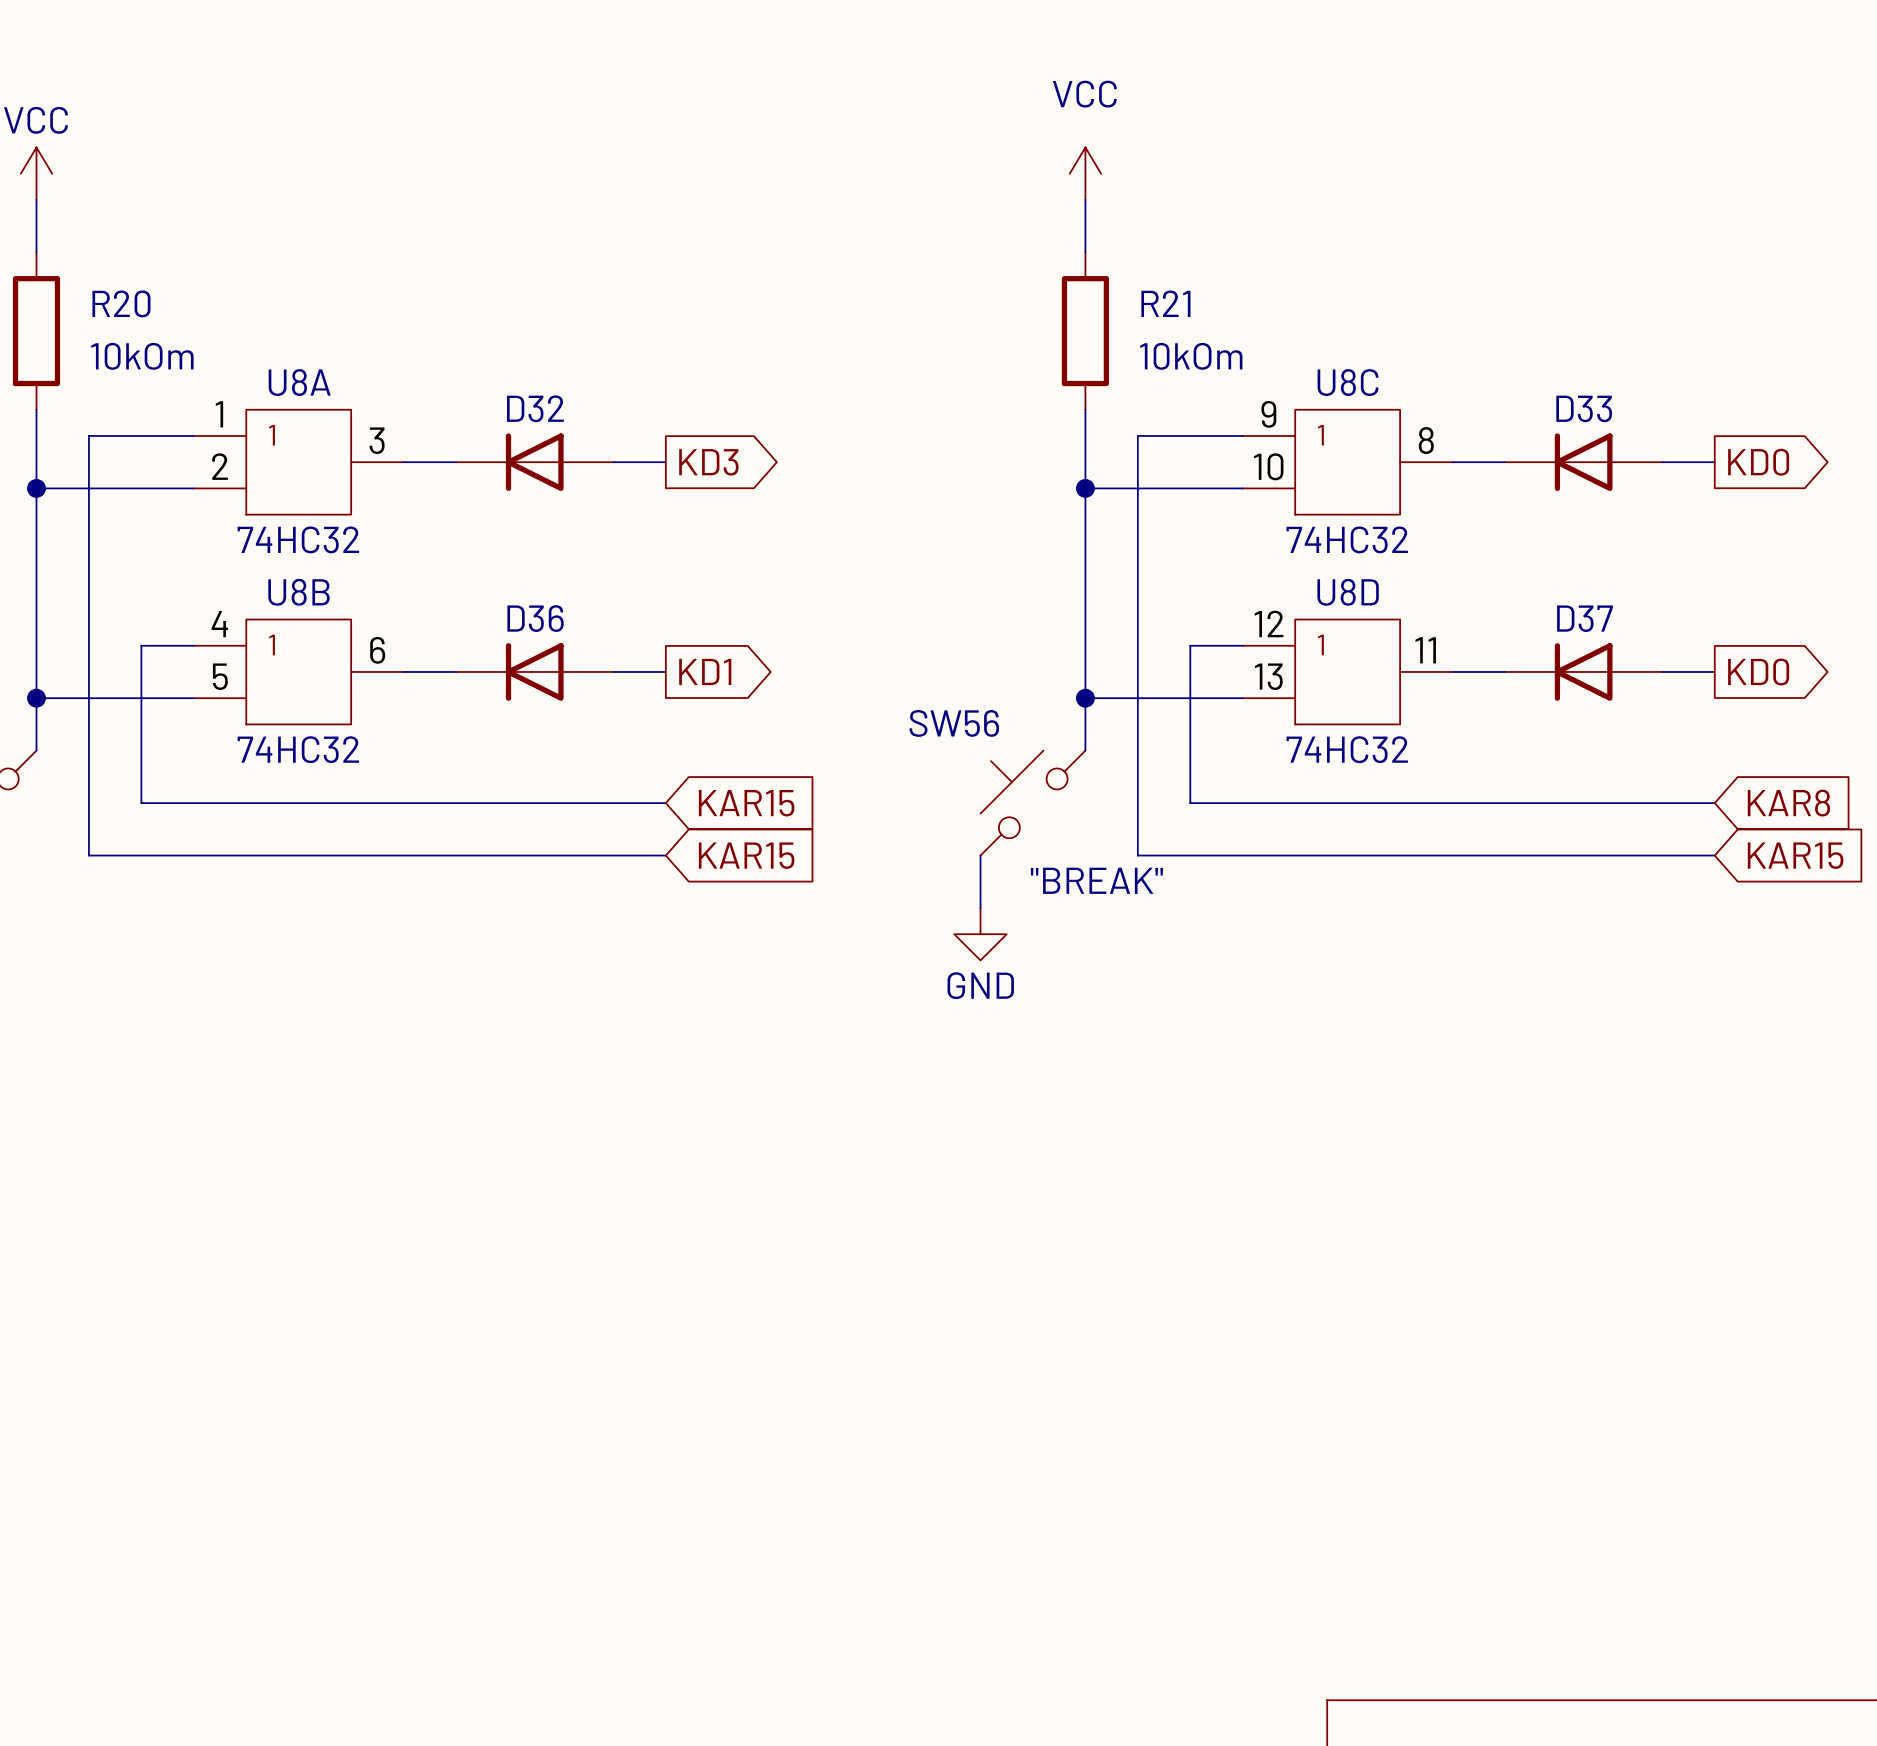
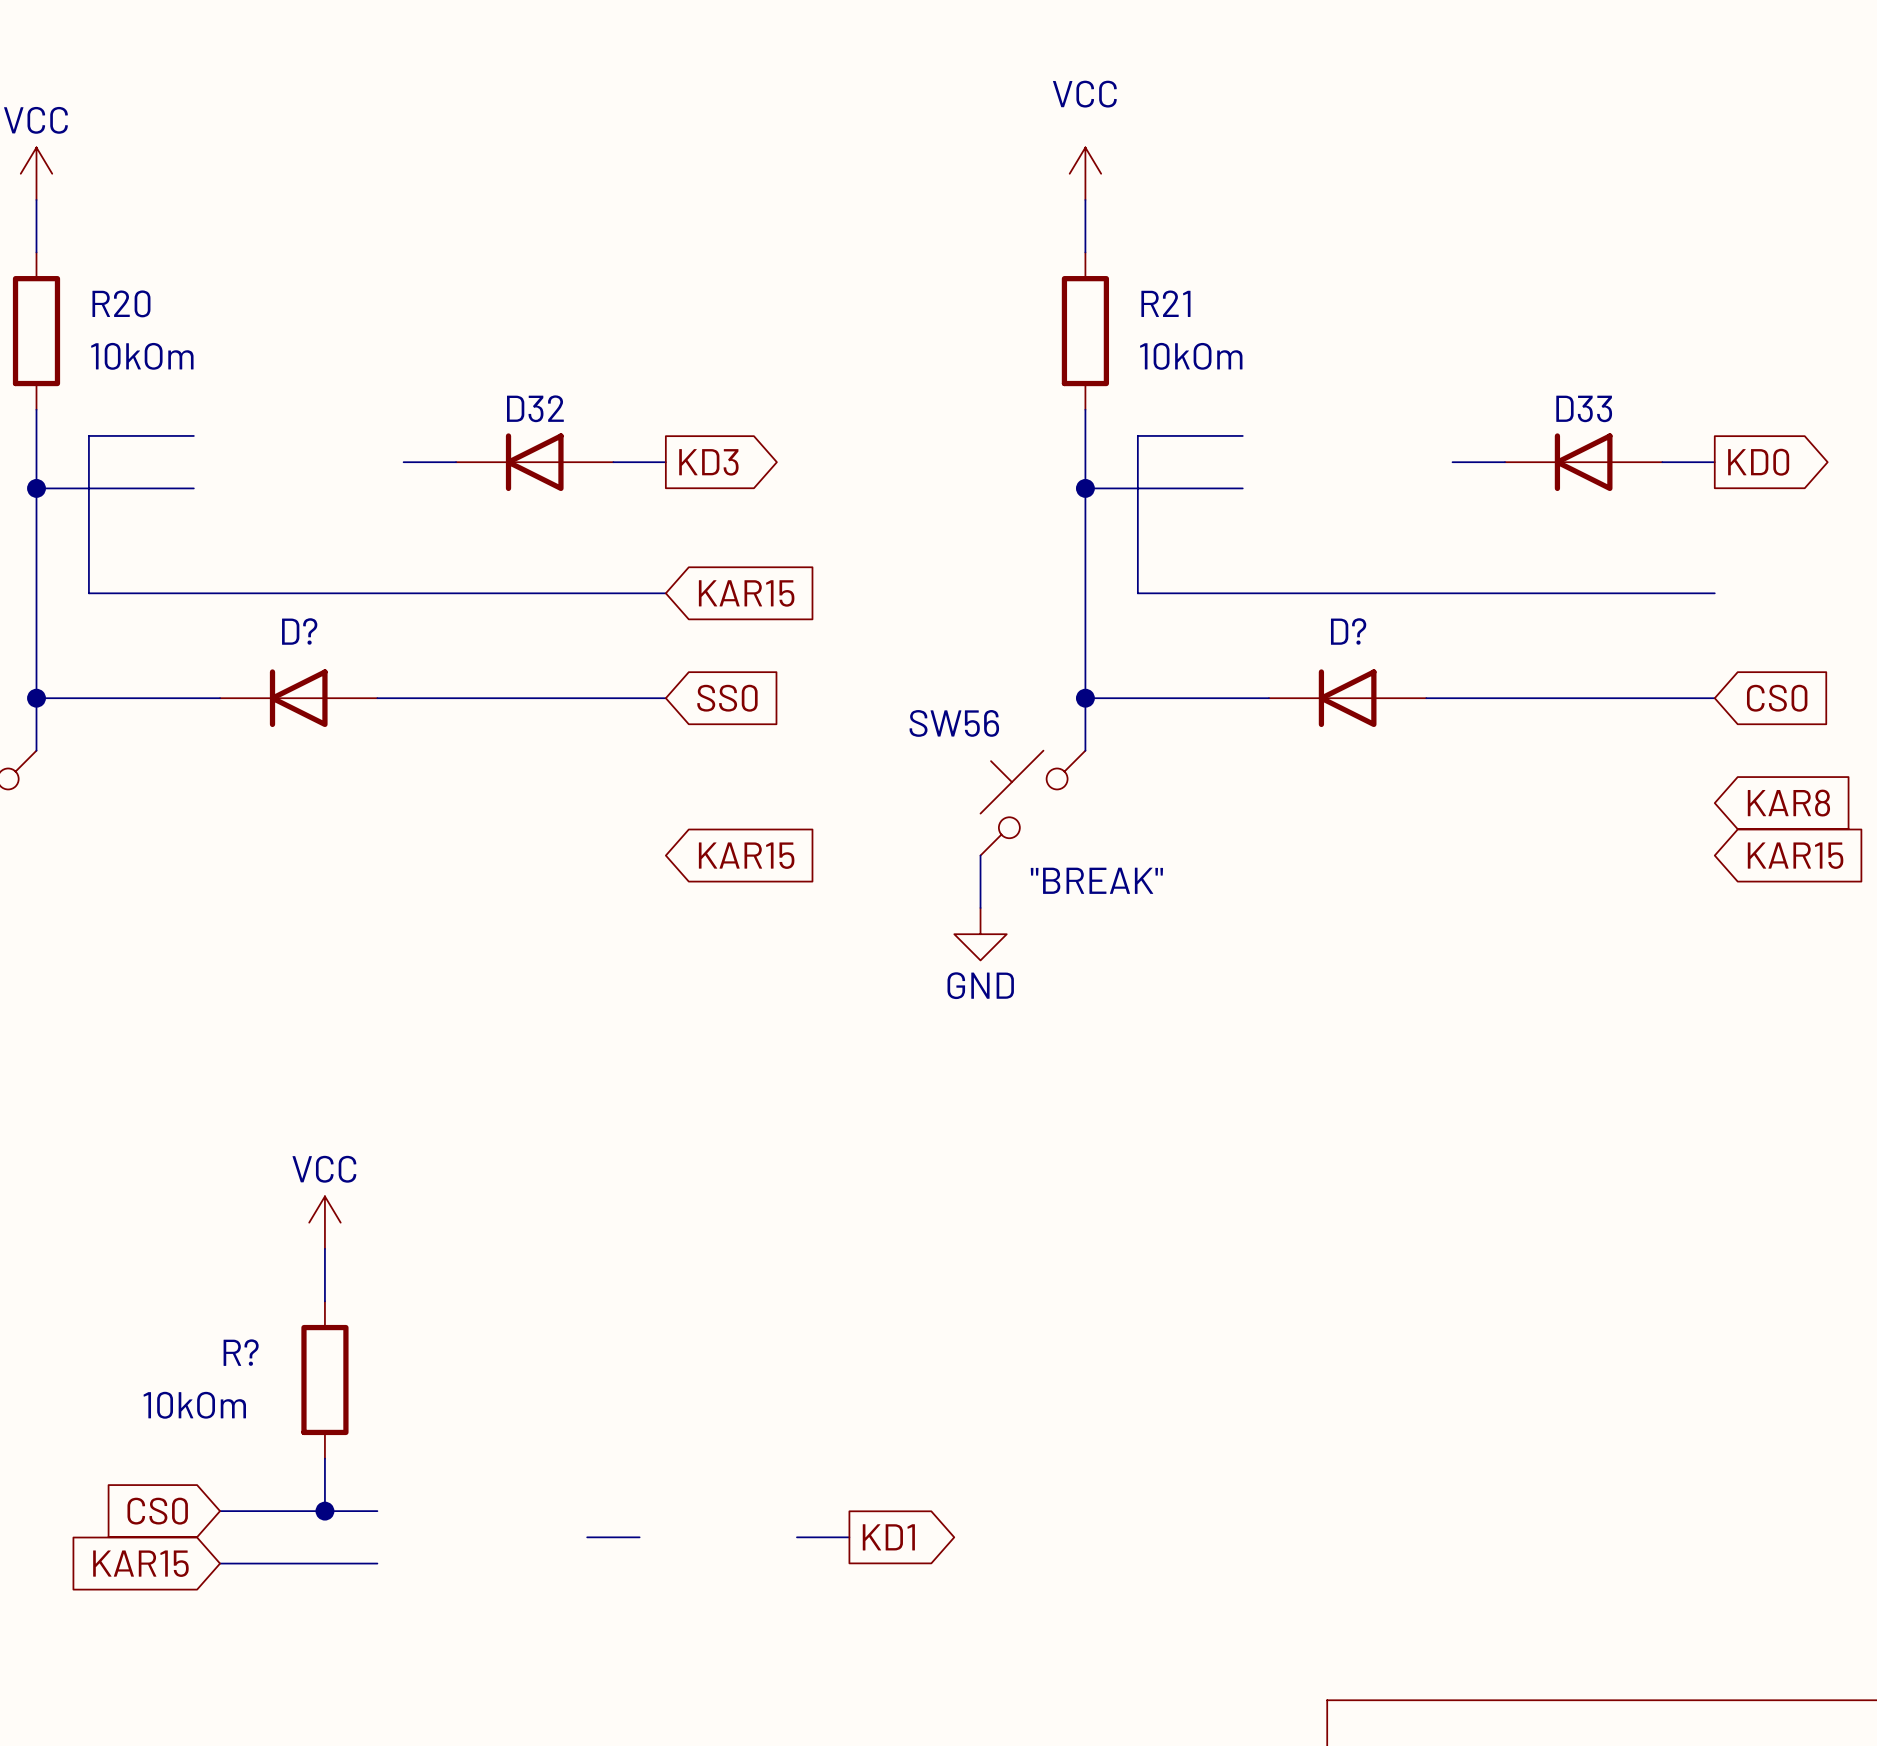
U8A: 74HC32 (298, 462) -> none
U8C: 74HC32 (1347, 462) -> none
wire: (88, 593) (88, 855) (665, 855) -> (88, 593) (665, 593)
wire: (1137, 593) (1137, 855) (1714, 855) -> (1137, 593) (1714, 593)
wire: (193, 645) (141, 645) (141, 803) (665, 803) -> none
wire: (1242, 645) (1190, 645) (1190, 803) (1714, 803) -> none
U8B: 74HC32 (298, 671) -> none
wire: (403, 671) (456, 671) -> none
D36: (534, 671) -> none
wire: (613, 671) (665, 671) -> none
global label: KD1 (705, 671) -> none
U8D: 74HC32 (1347, 671) -> none
wire: (1452, 671) (1504, 671) -> none
D37: (1583, 671) -> none
wire: (1662, 671) (1714, 671) -> none
global label: KD0 (1758, 672) -> none
D?: none -> (298, 698)
wire: none -> (377, 698) (665, 698)
global label: none -> SS0 (727, 698)
D?: none -> (1347, 698)
wire: none -> (1426, 698) (1714, 698)
global label: none -> CS0 (1777, 698)
global label position: KAR15 (746, 803) -> KAR15 (746, 593)
power symbol: none -> VCC (324, 1222)
wire: none -> (324, 1248) (324, 1301)
R?: none -> 10kOm (324, 1380)
wire: none -> (324, 1458) (324, 1511)
global label: none -> CS0 (157, 1511)
wire: none -> (220, 1511) (377, 1511)
junction: none -> (324, 1511)
wire: none -> (587, 1537) (639, 1537)
wire: none -> (796, 1537) (849, 1537)
global label: none -> KD1 (888, 1537)
global label: none -> KAR15 (140, 1563)
wire: none -> (220, 1563) (377, 1563)

